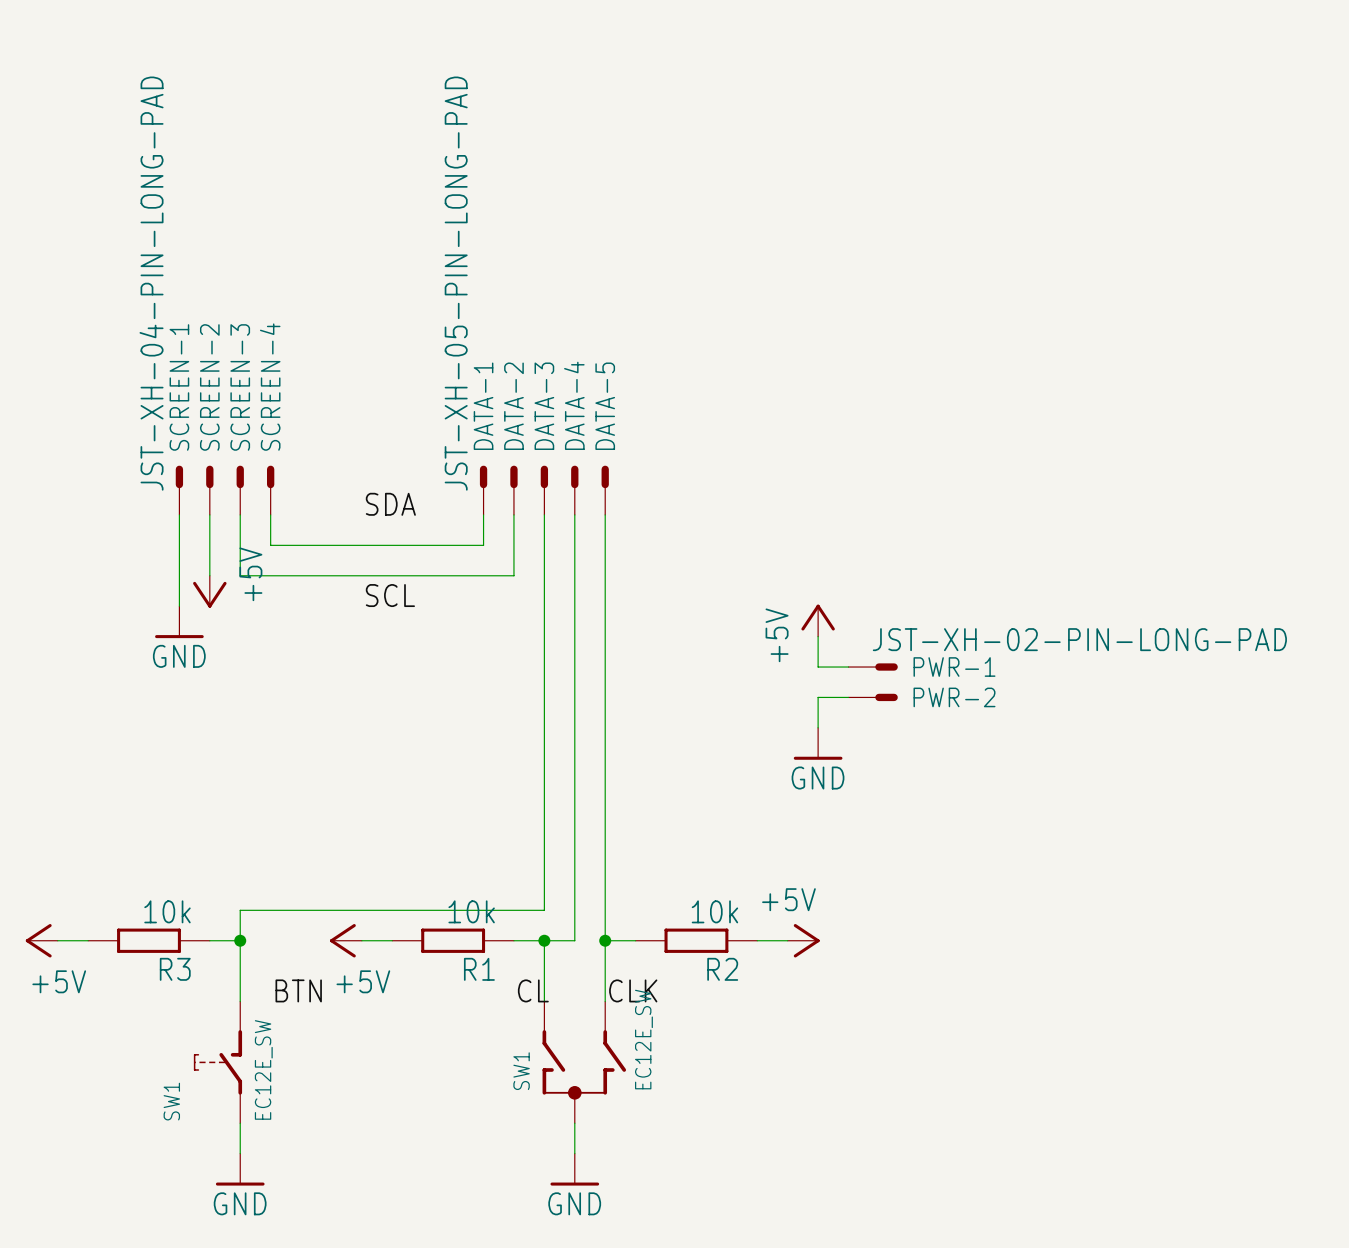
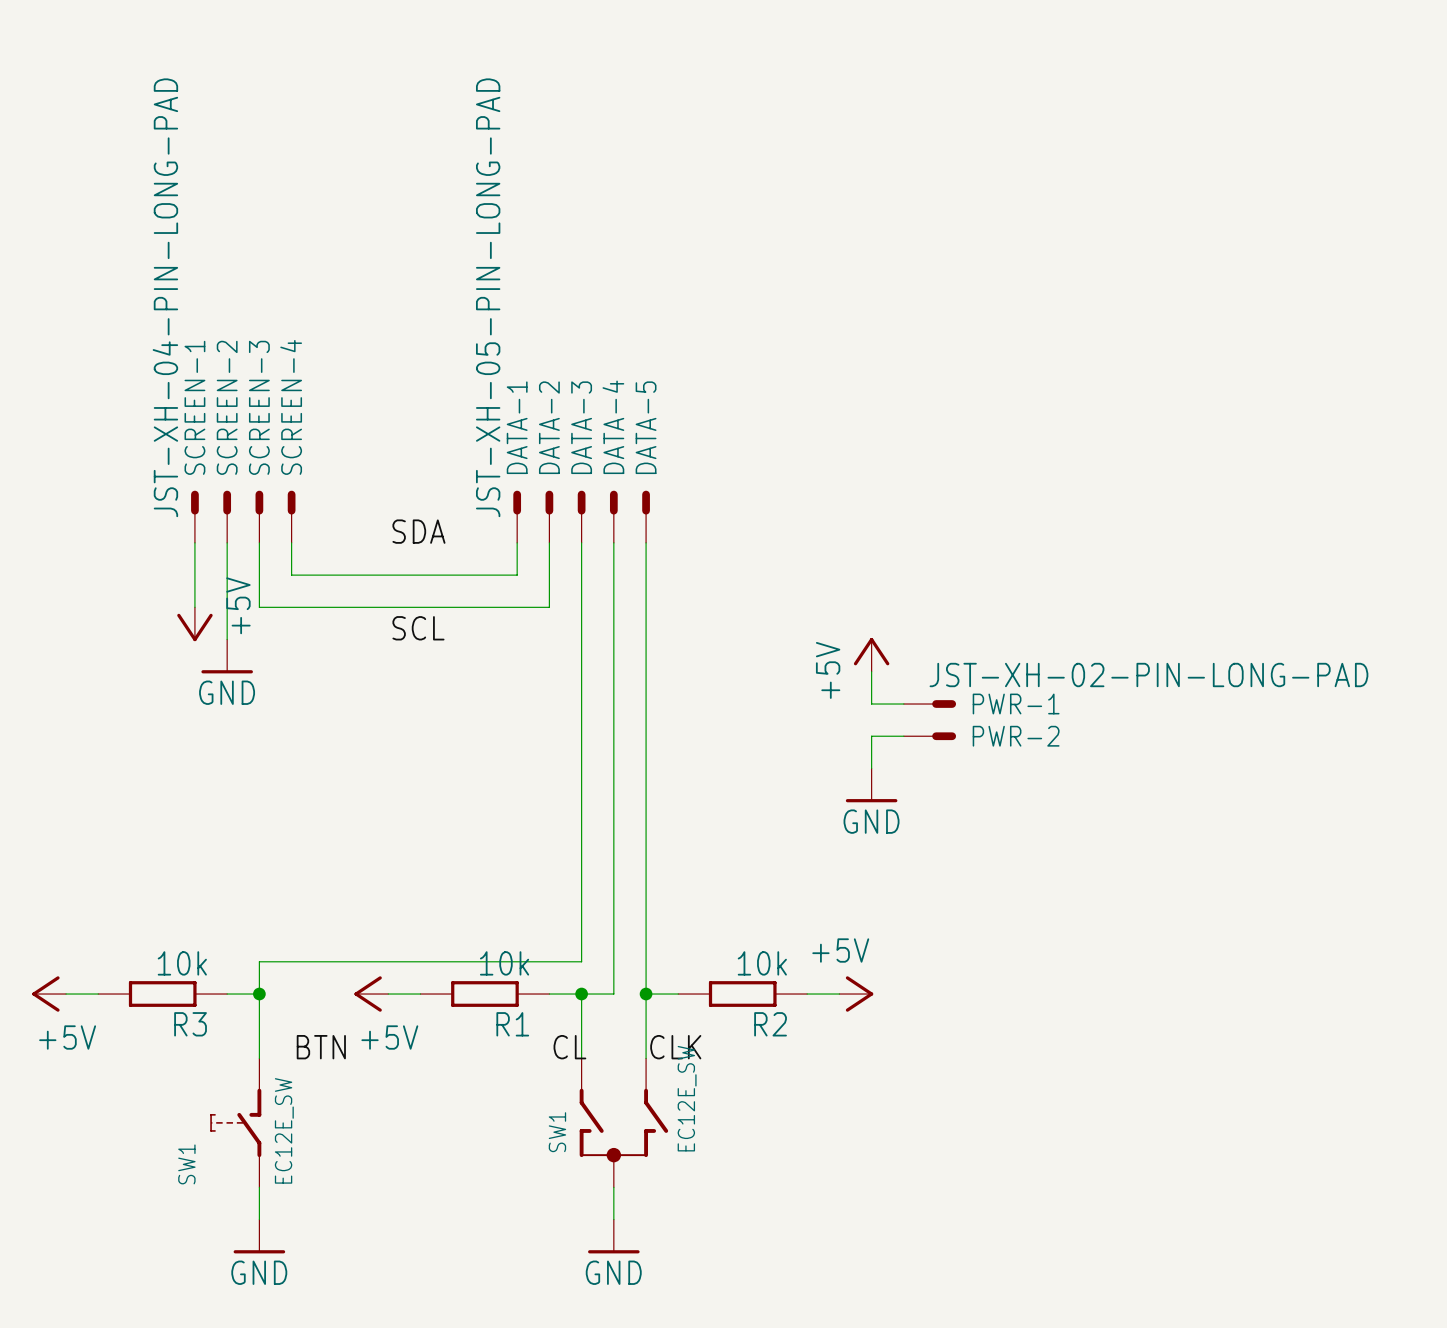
power symbol position: +5V (209, 591) -> +5V (194, 624)
power symbol position: GND (179, 622) -> GND (227, 656)

